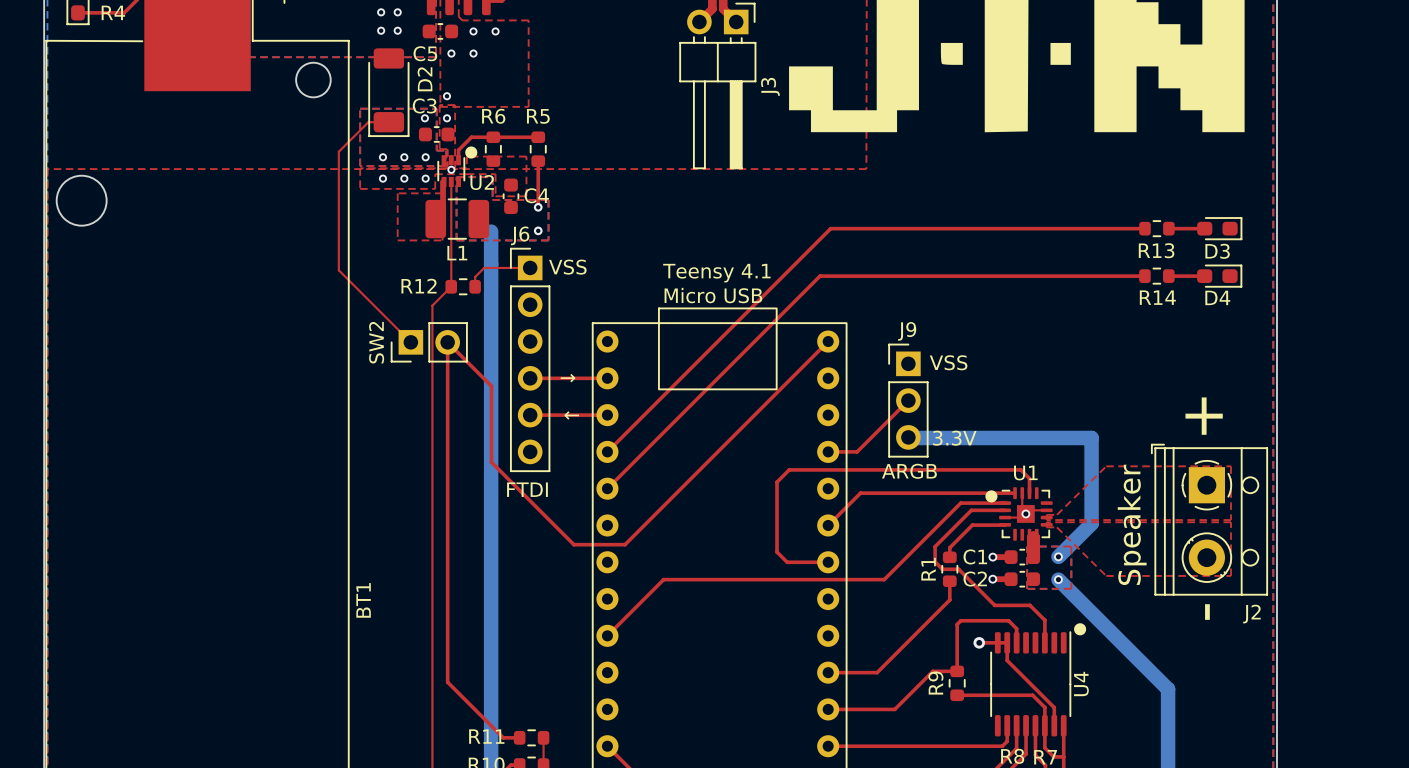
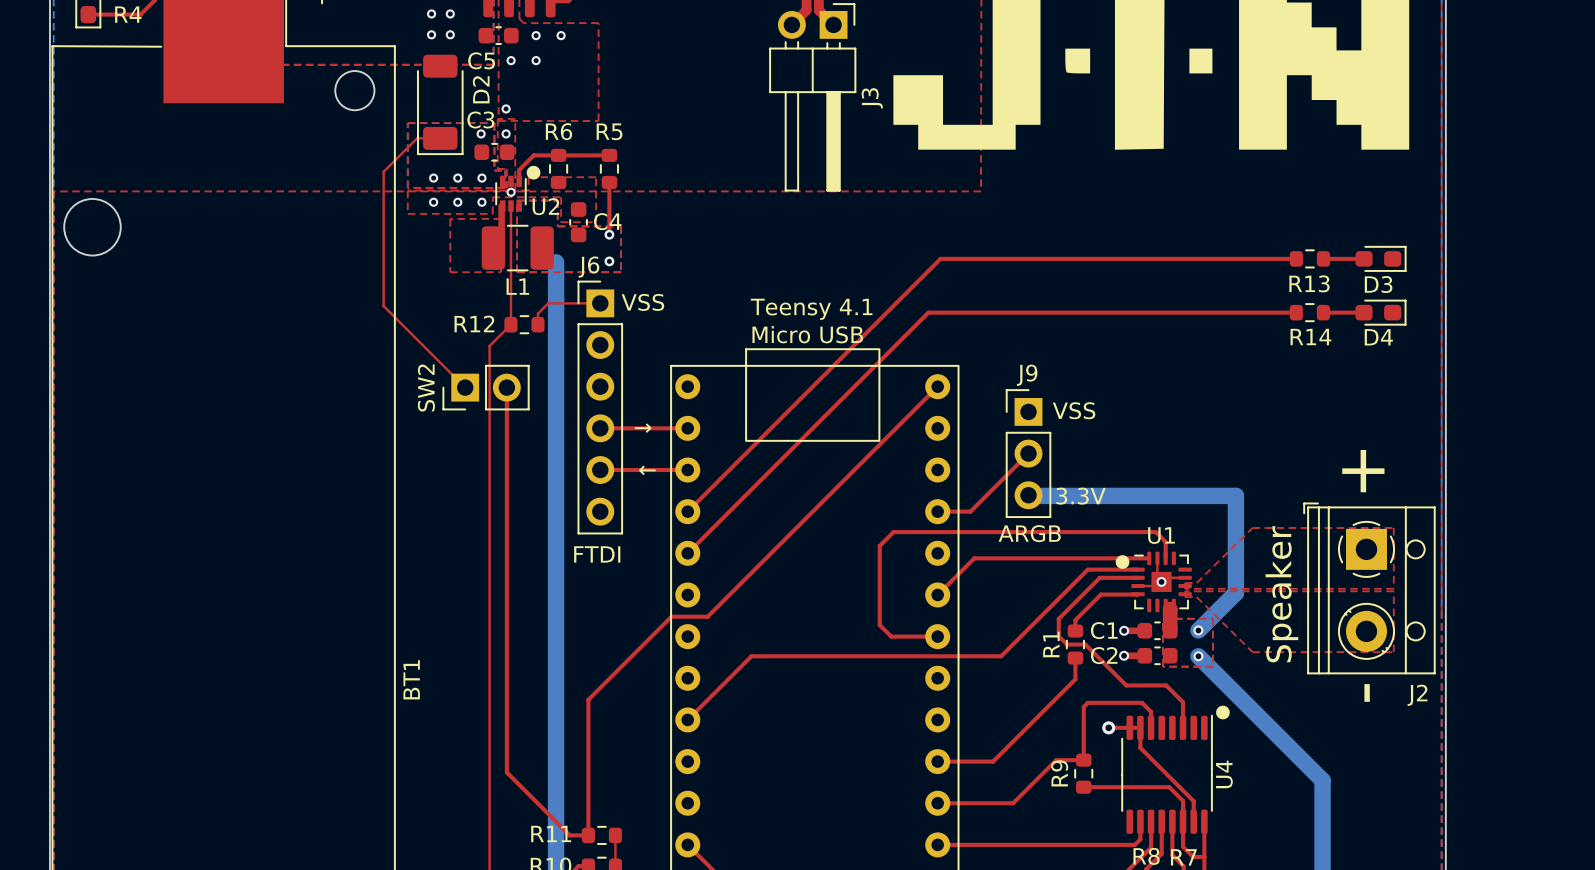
top track: (447, 342) (491, 386) (491, 462) (573, 544) (593, 544) -> (588, 835) (588, 699) (671, 616)

